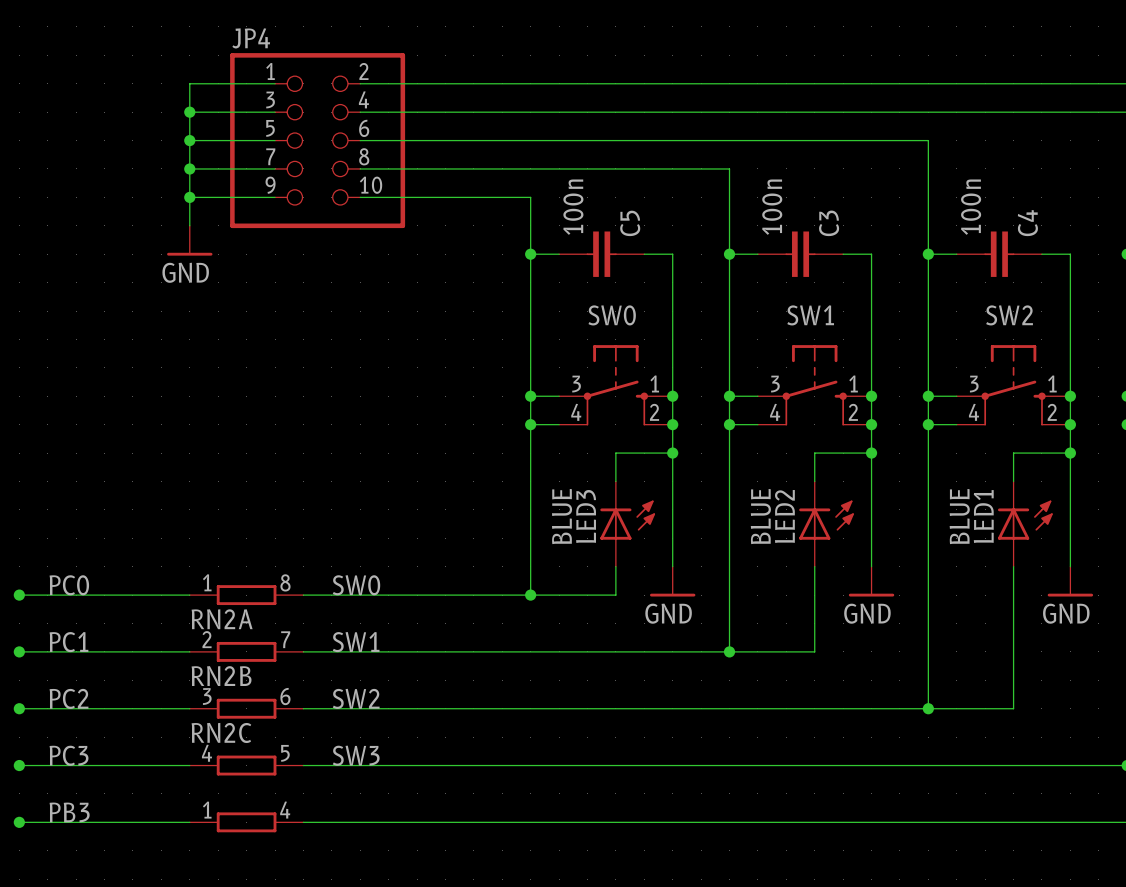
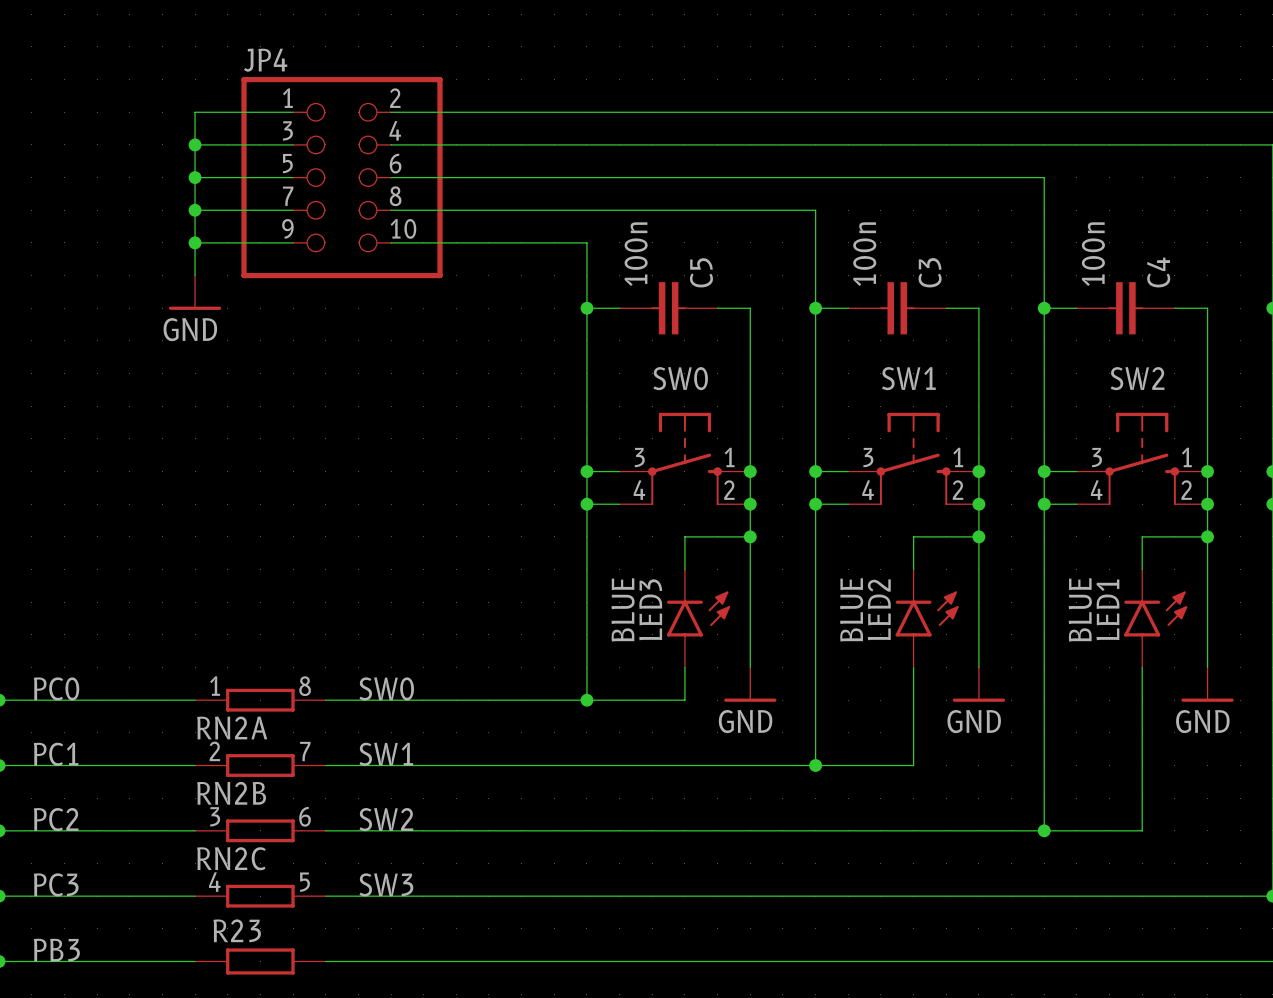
LED3 symbol: [600, 481, 656, 567] -> [667, 569, 731, 668]
LED2 symbol: [799, 481, 854, 567] -> [895, 569, 959, 668]
LED1 symbol: [997, 481, 1053, 567] -> [1124, 569, 1188, 668]
part: (246, 822) -> none
R23: none -> (260, 961)

